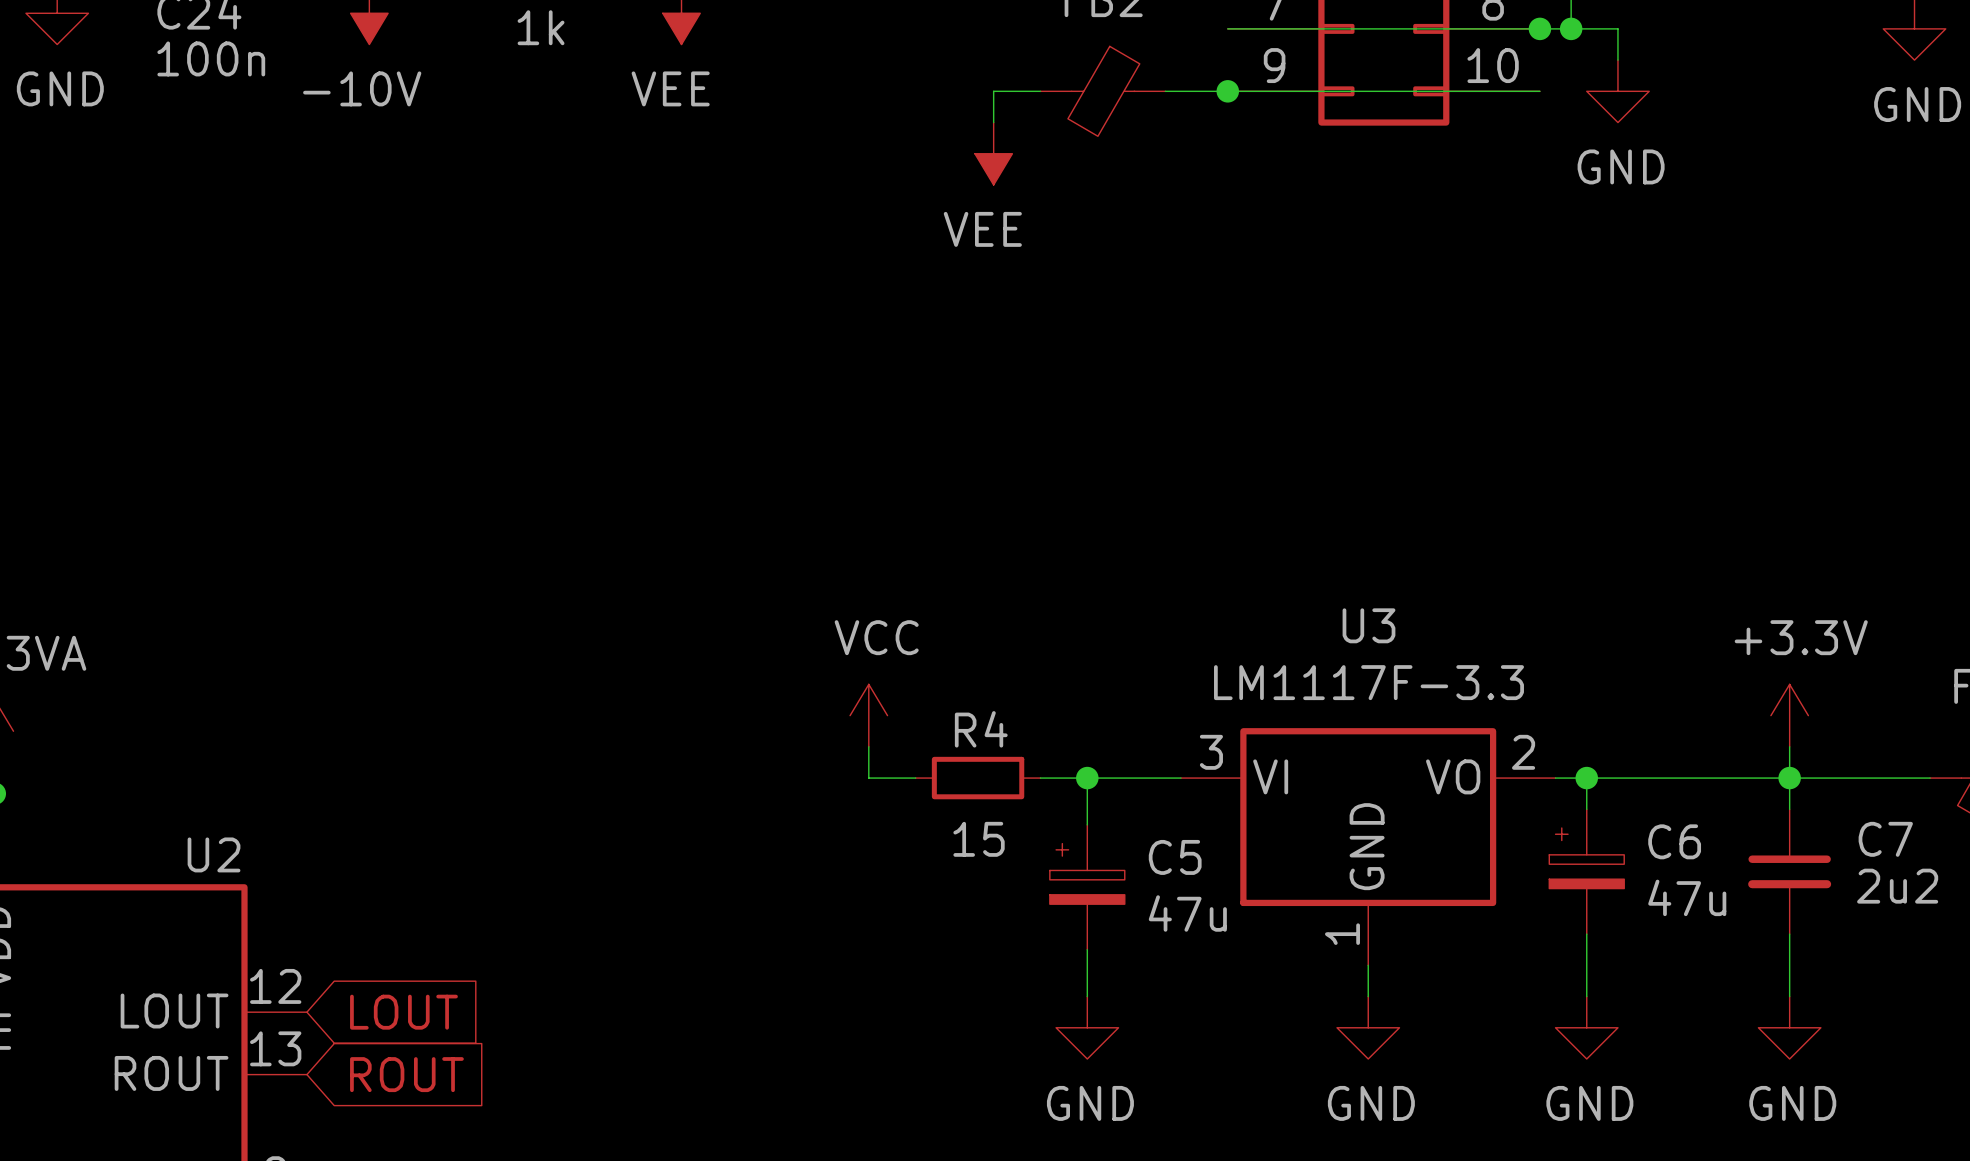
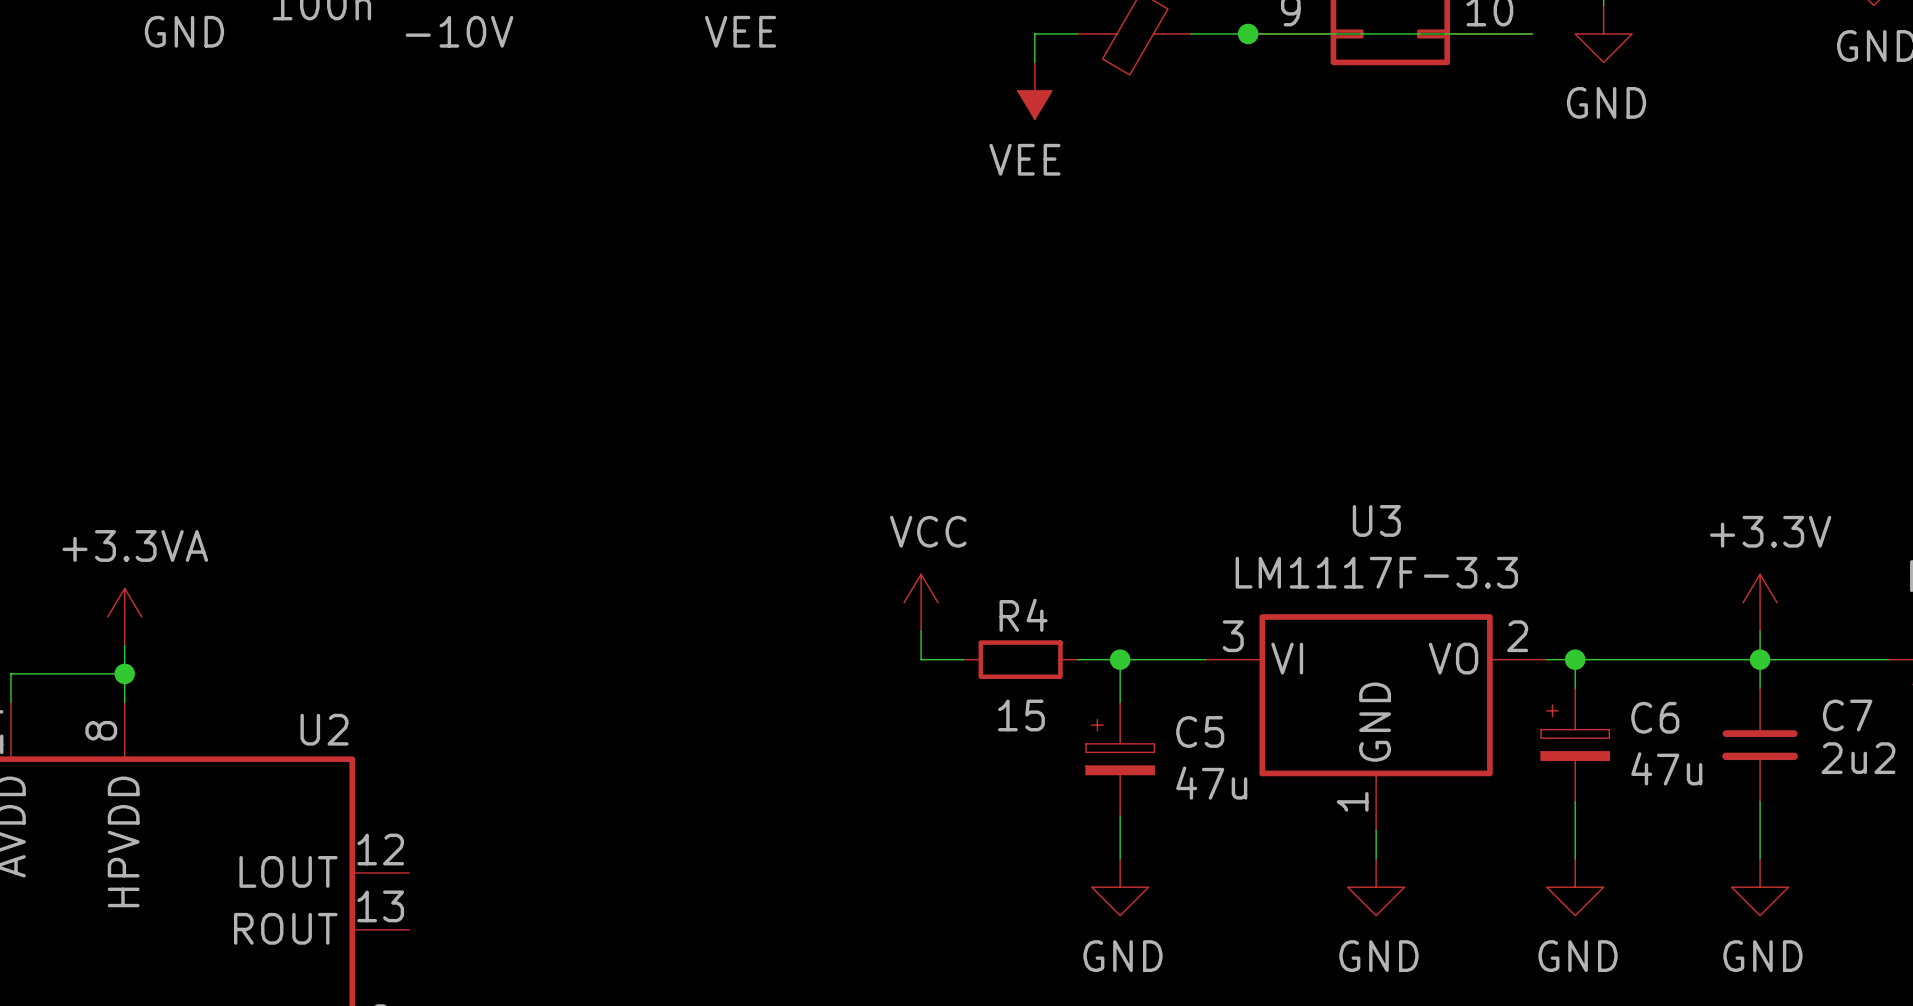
global label: LOUT (403, 1012) -> none
global label: ROUT (406, 1074) -> none

